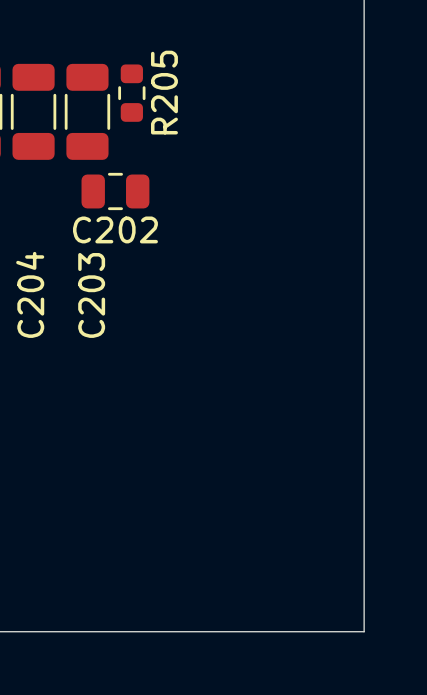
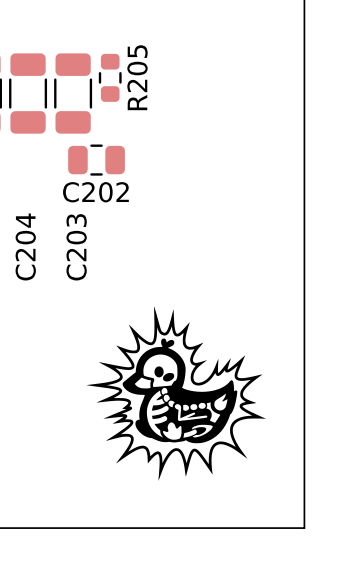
drawing: none -> [86, 306, 267, 481]

